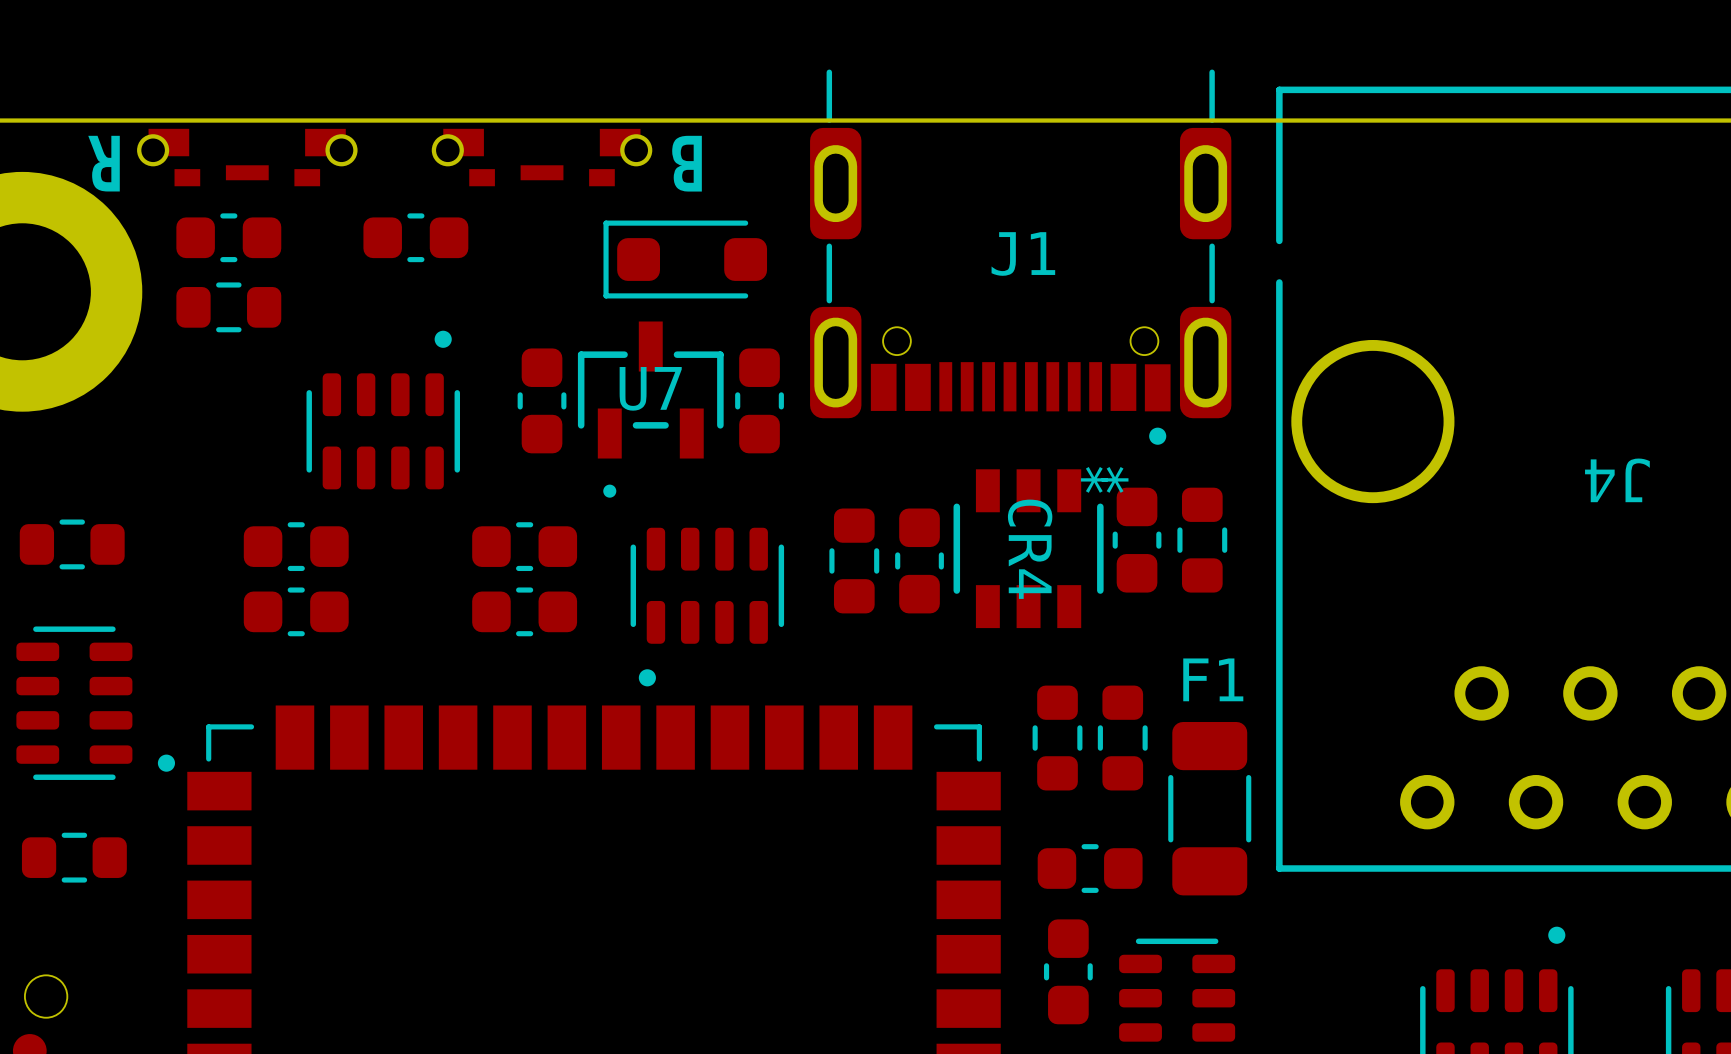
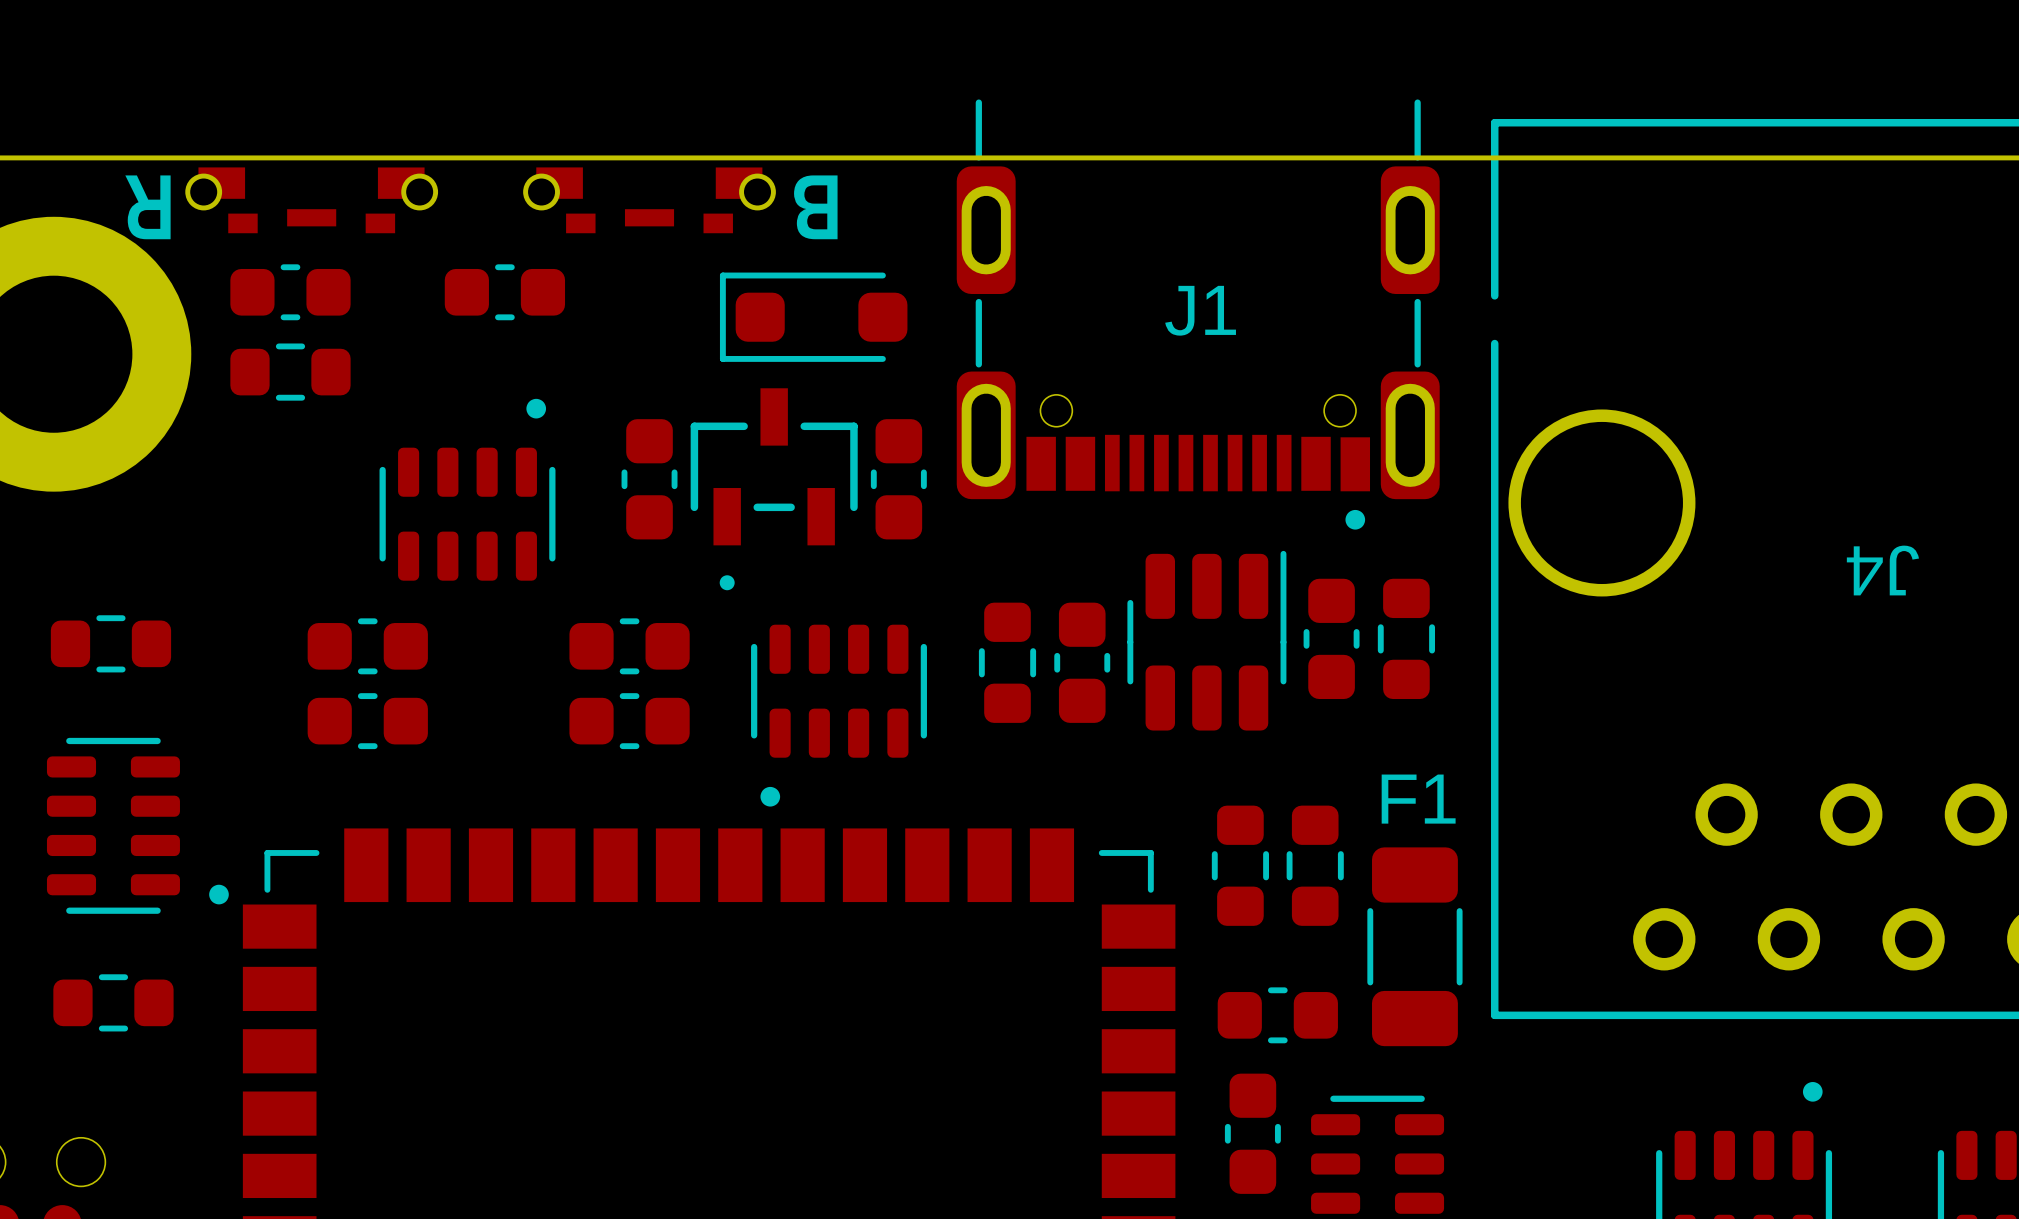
U7 name: U7 (650, 388) -> none
part: none -> (1206, 640)
CR4: (1028, 548) -> none

